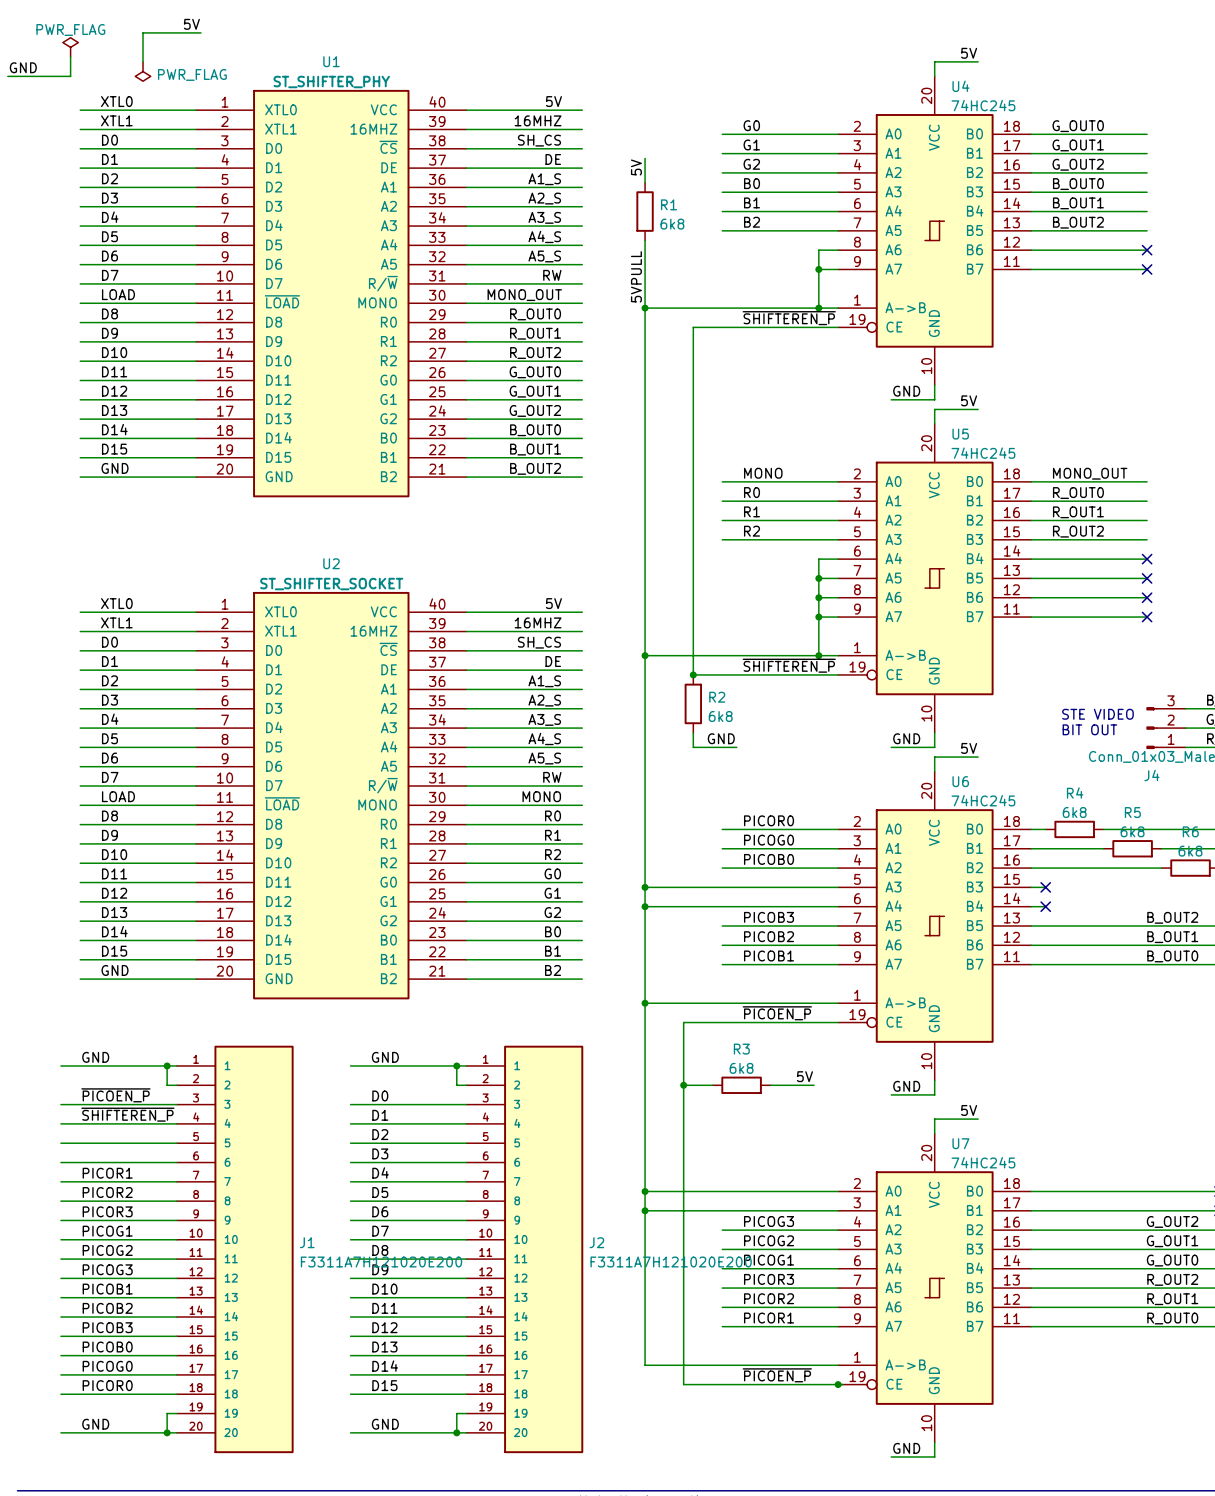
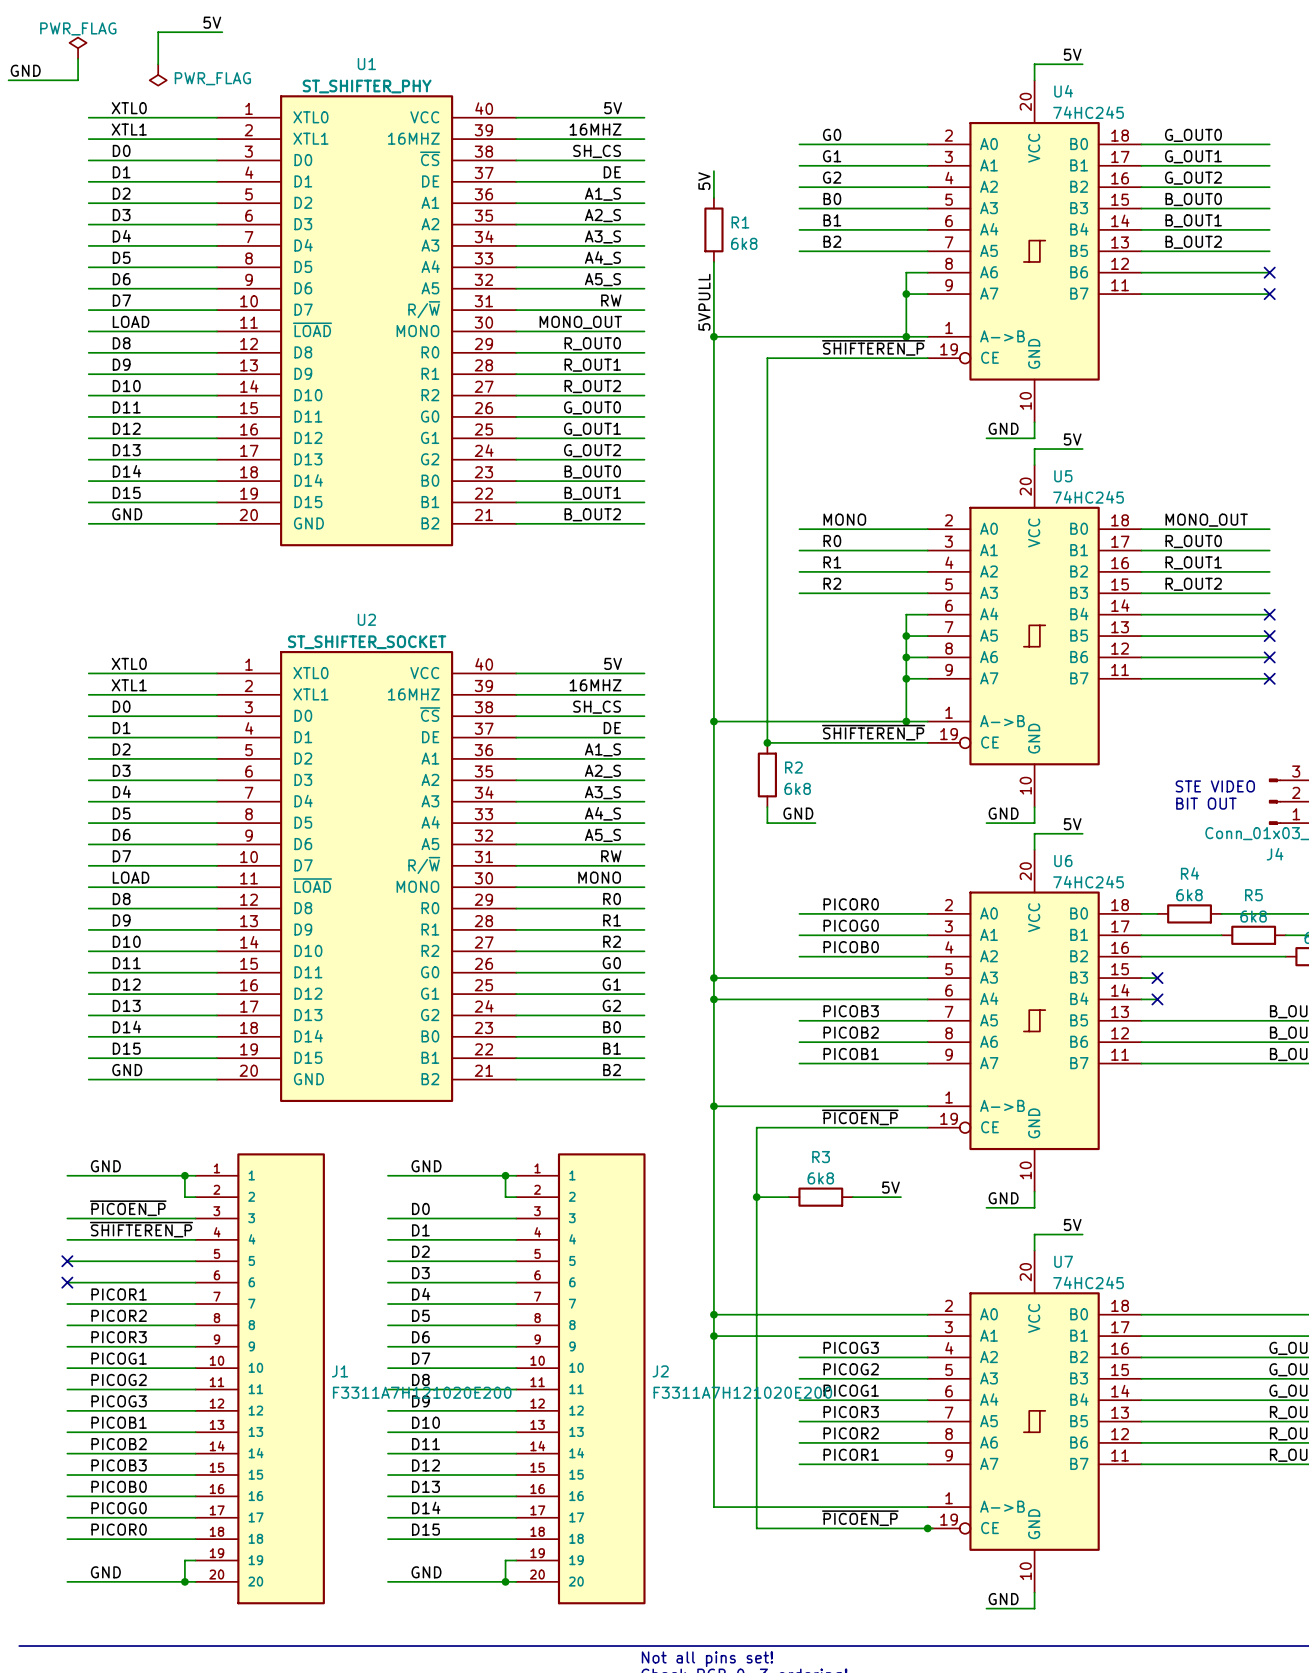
no-connect mark: none -> (67, 1261)
no-connect mark: none -> (67, 1282)

